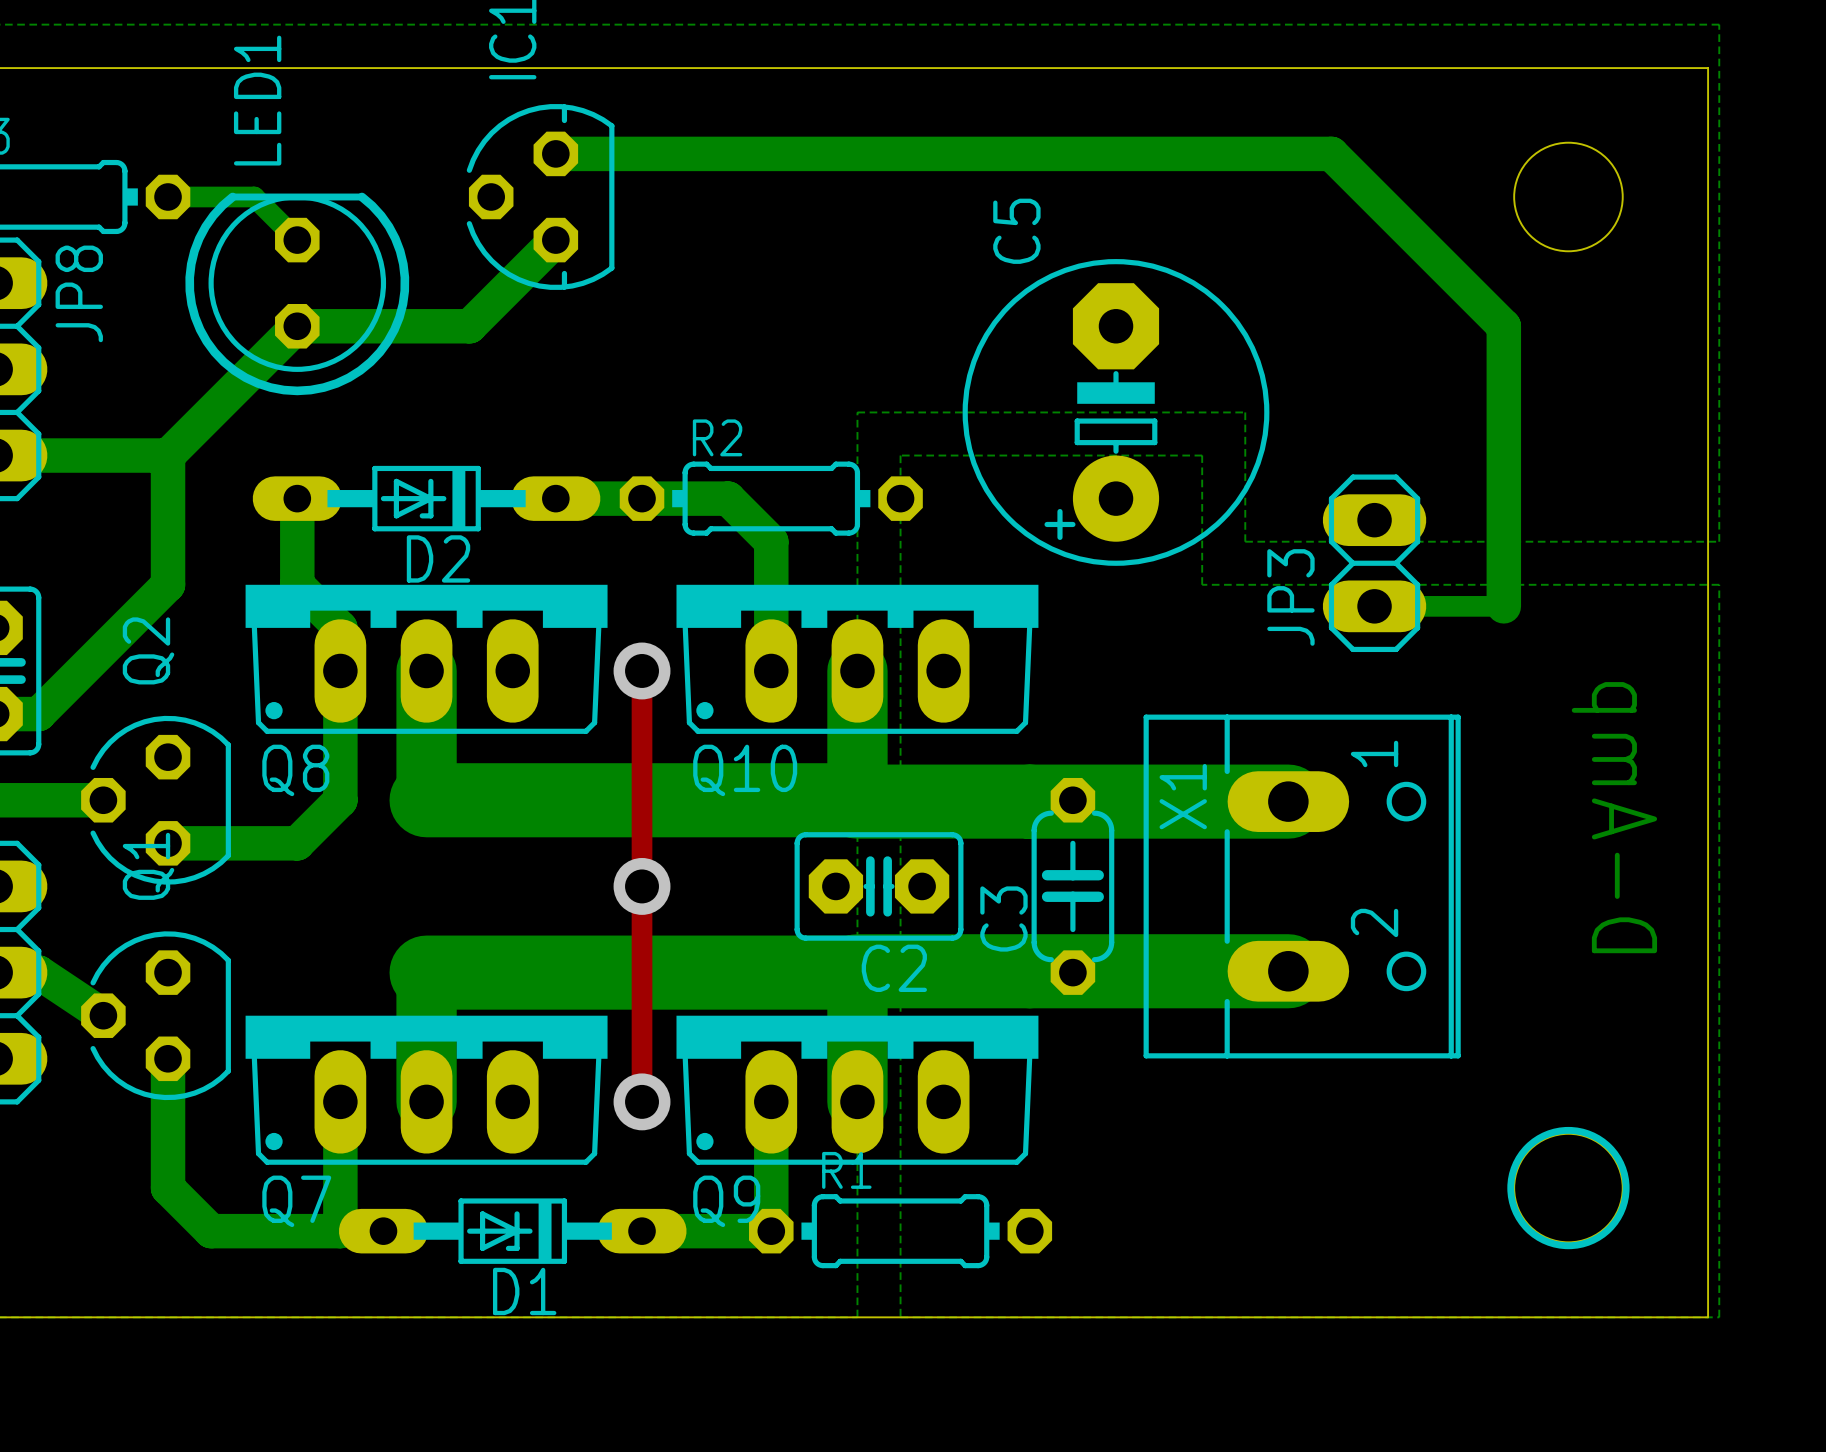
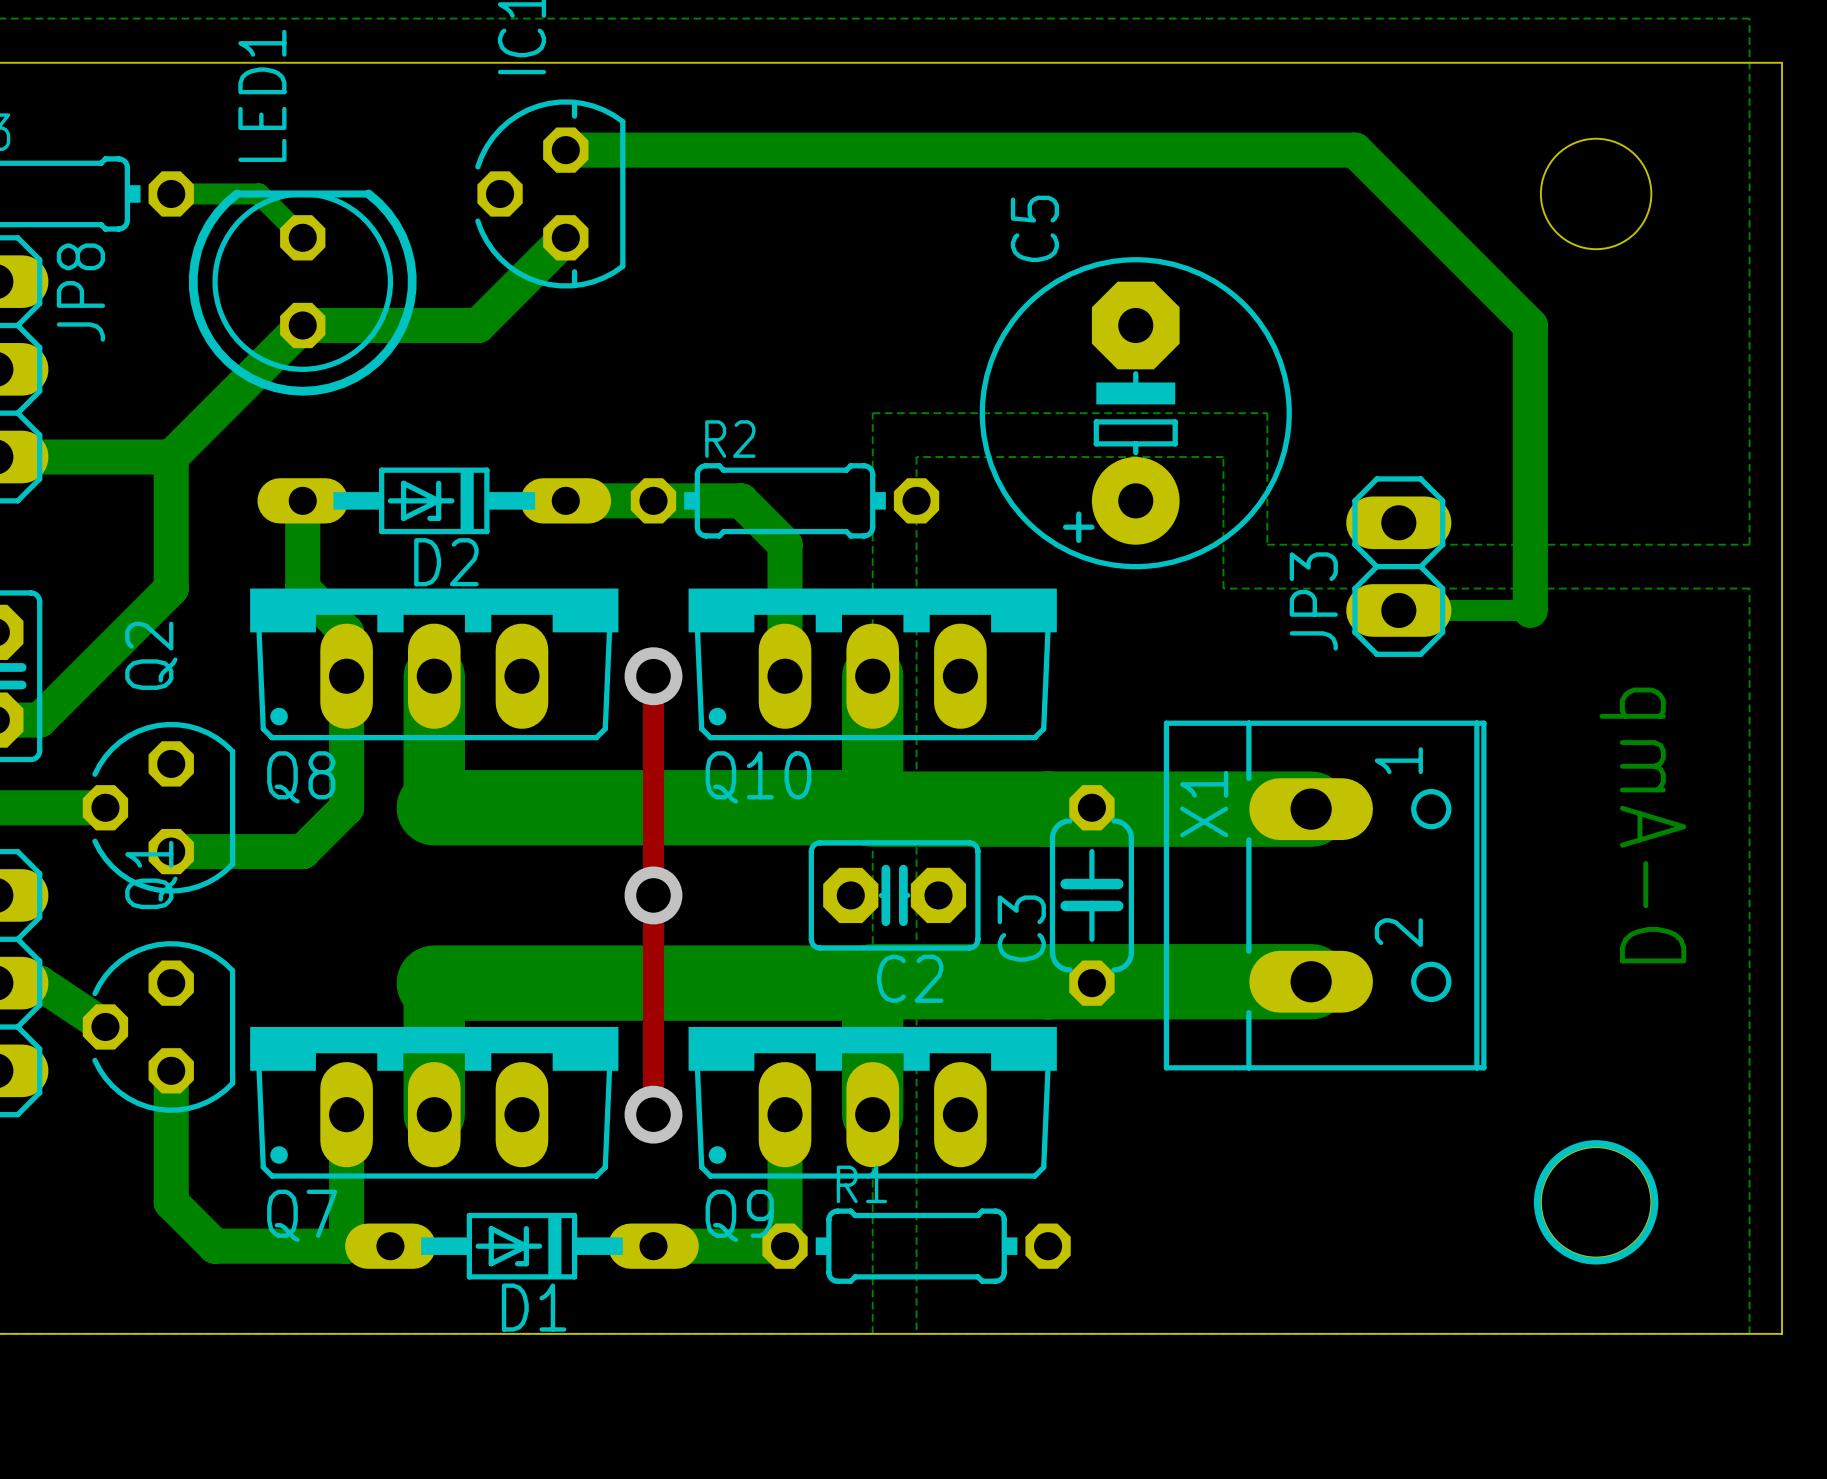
board edge: (1708, 68) (1708, 1317) -> (1738, 62) (1782, 62) (1782, 1333) (1738, 1333)

